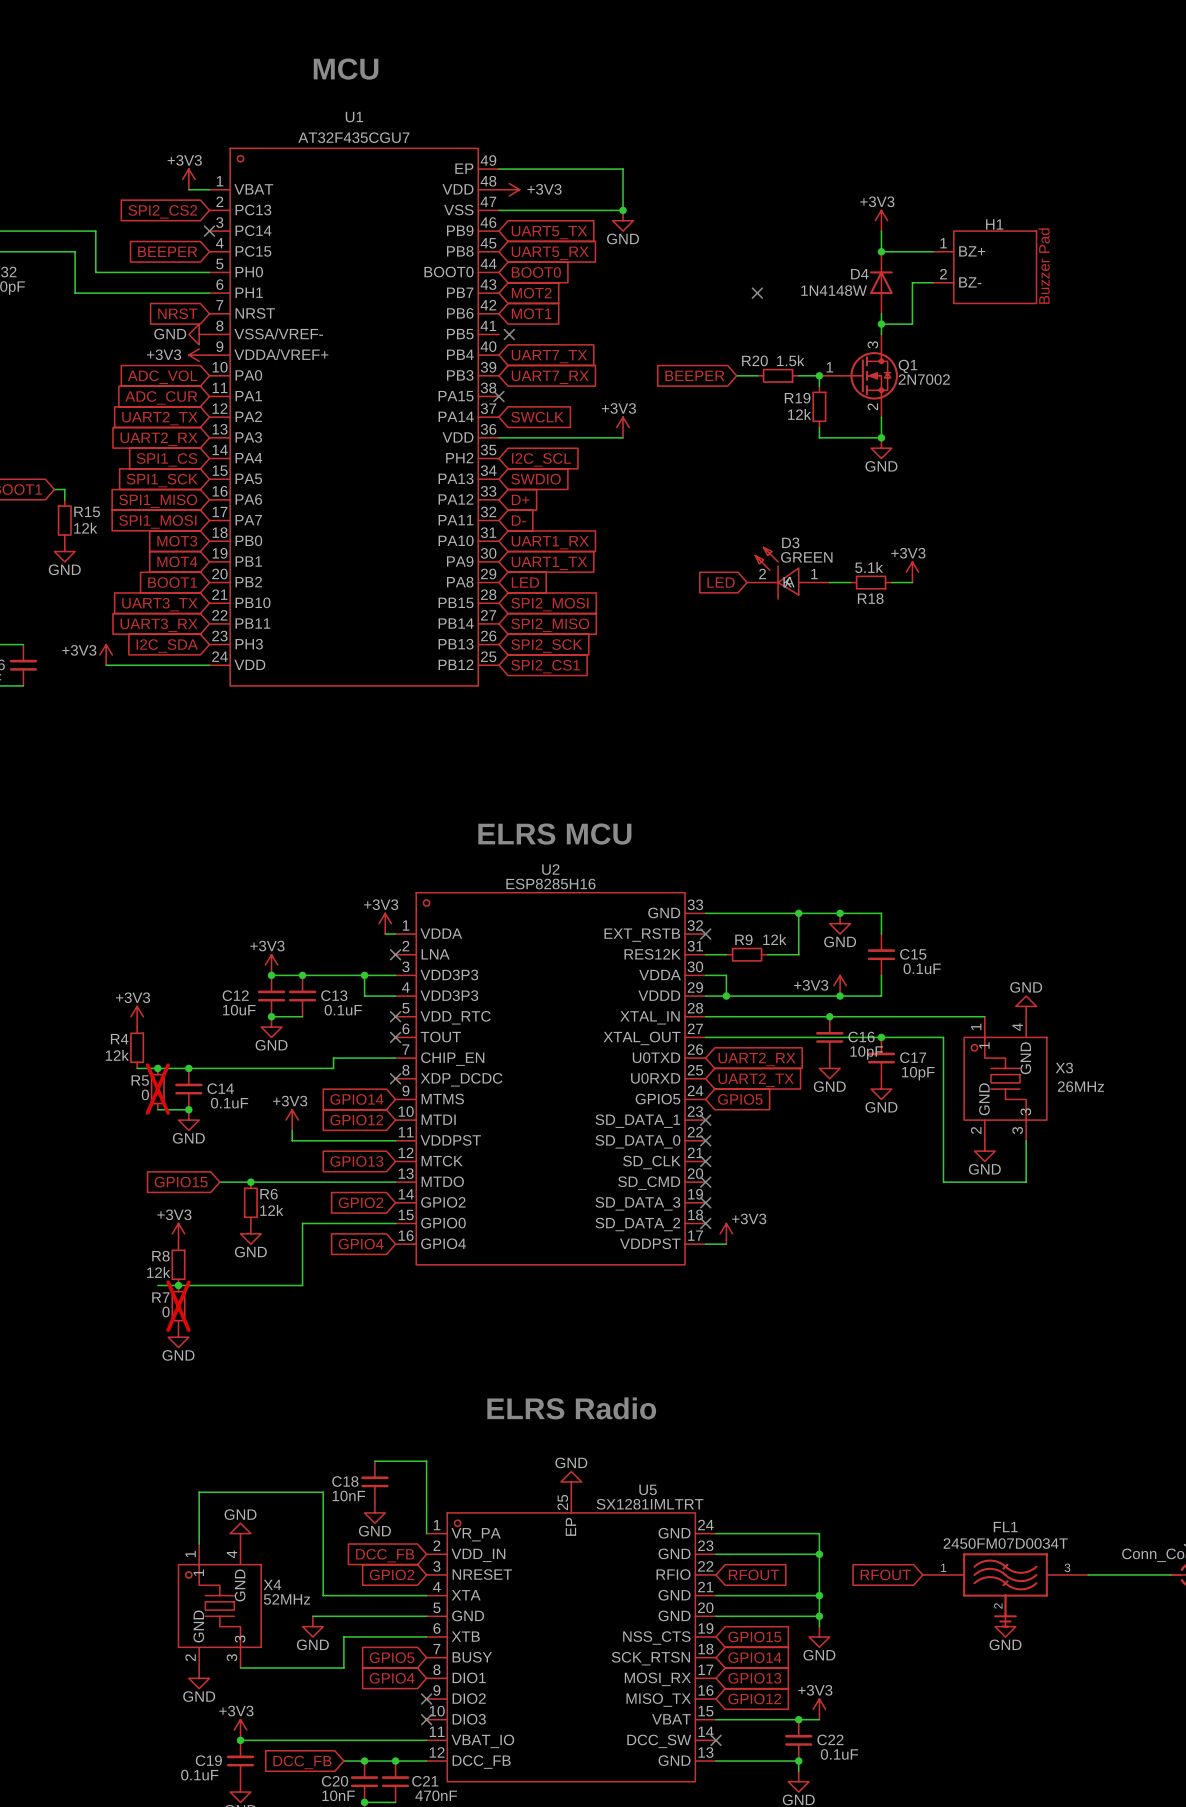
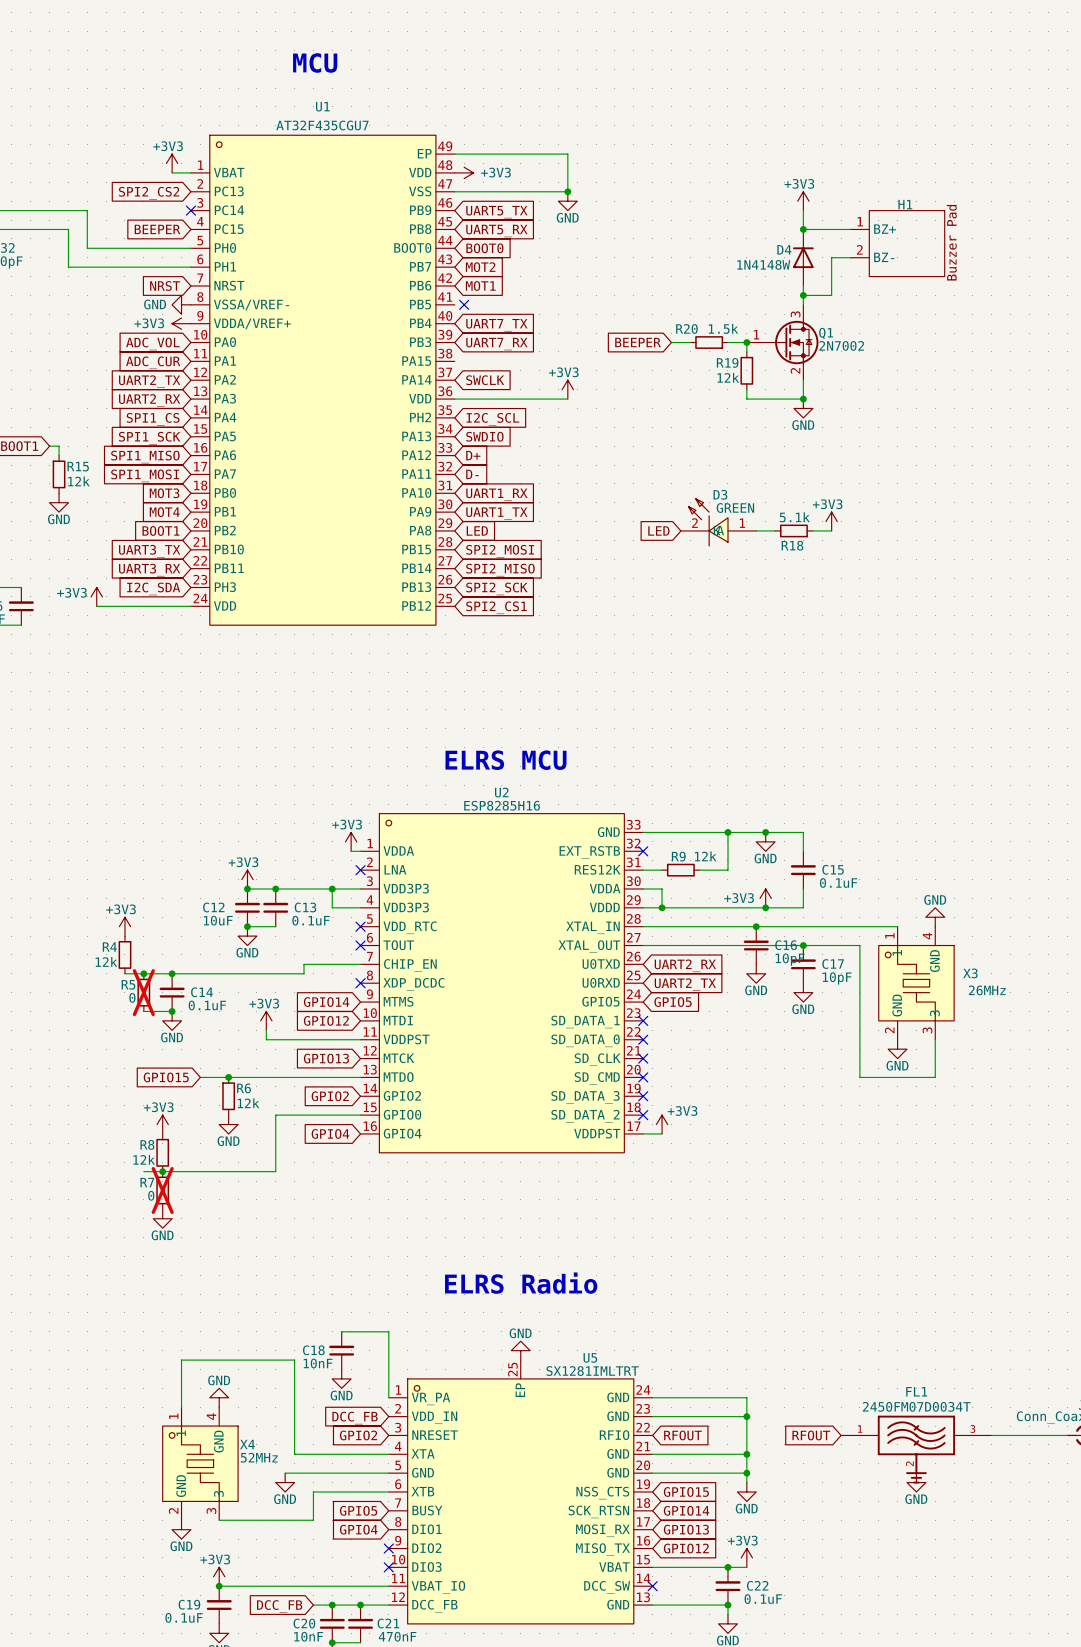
no-connect mark: (757, 293) -> none
no-connect mark: (498, 396) -> none

